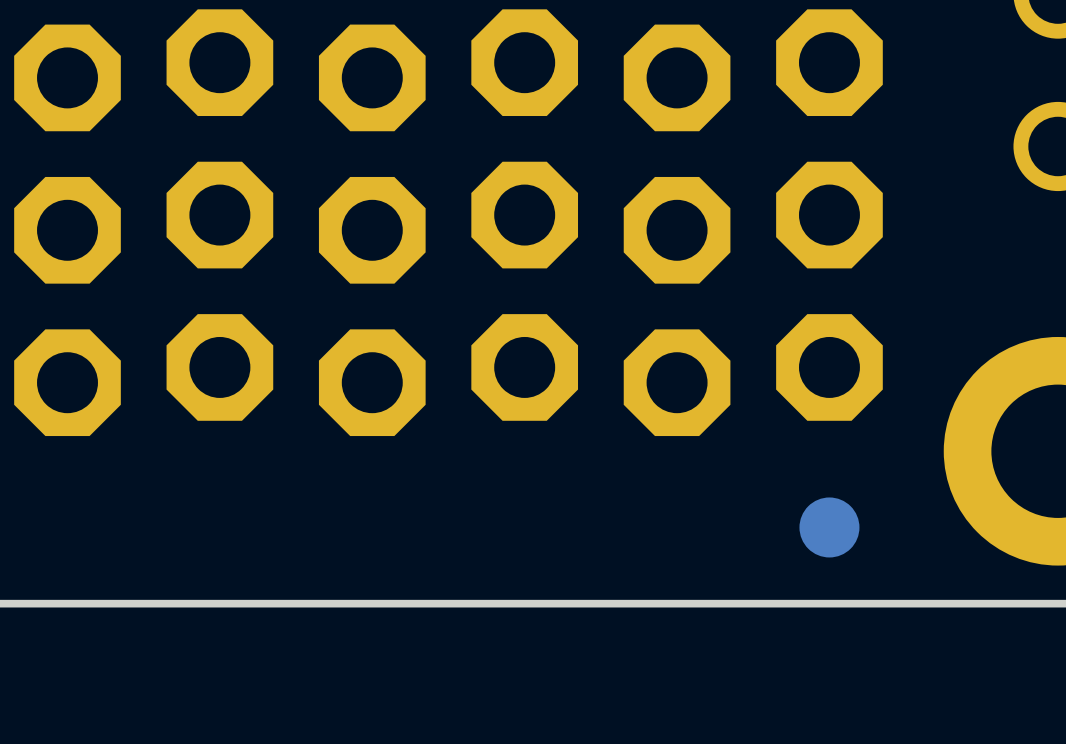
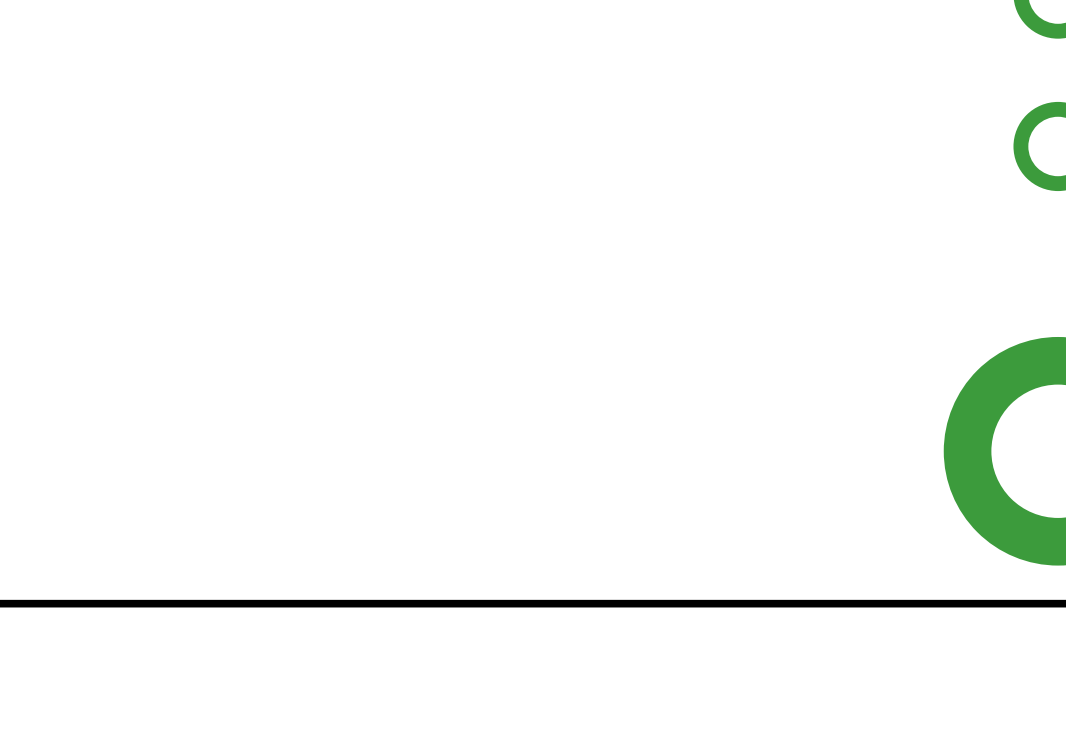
part: (448, 70) -> none
part: (448, 222) -> none
part: (448, 375) -> none
part: (829, 527) -> none

